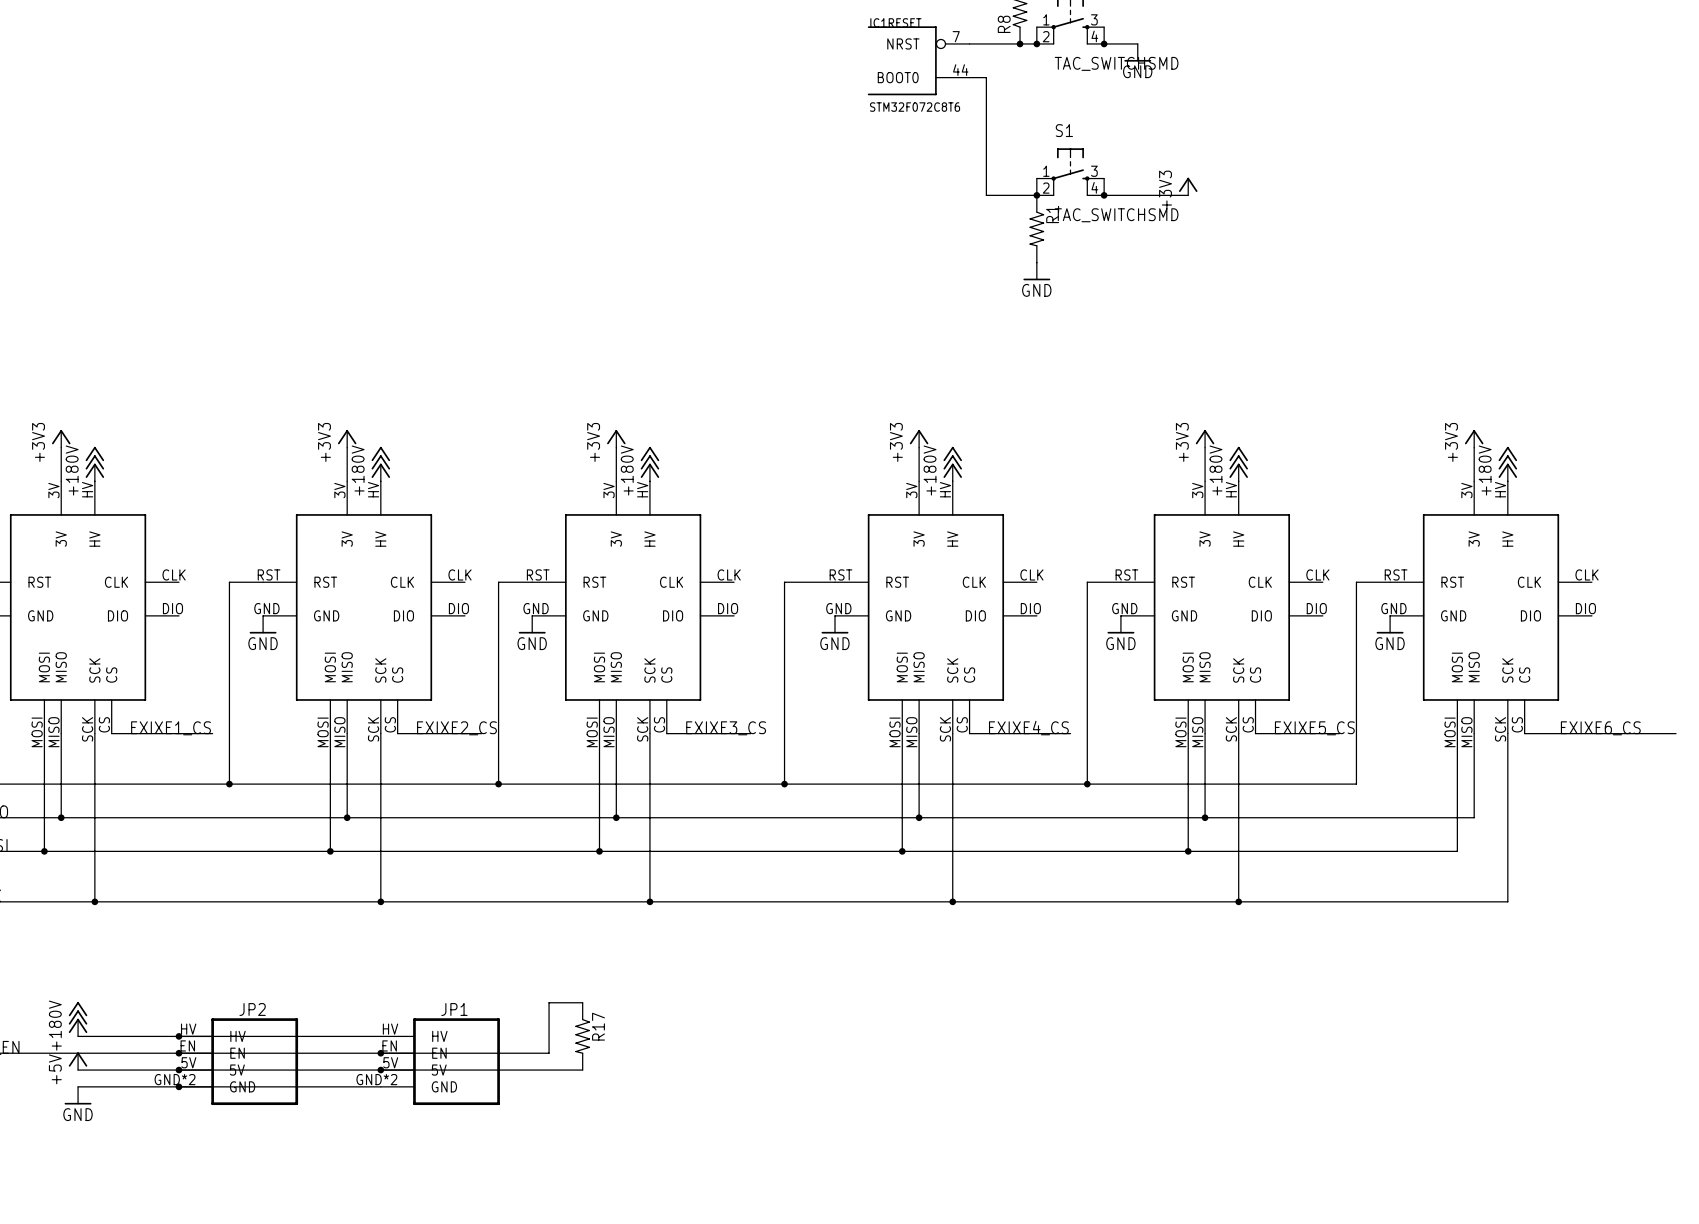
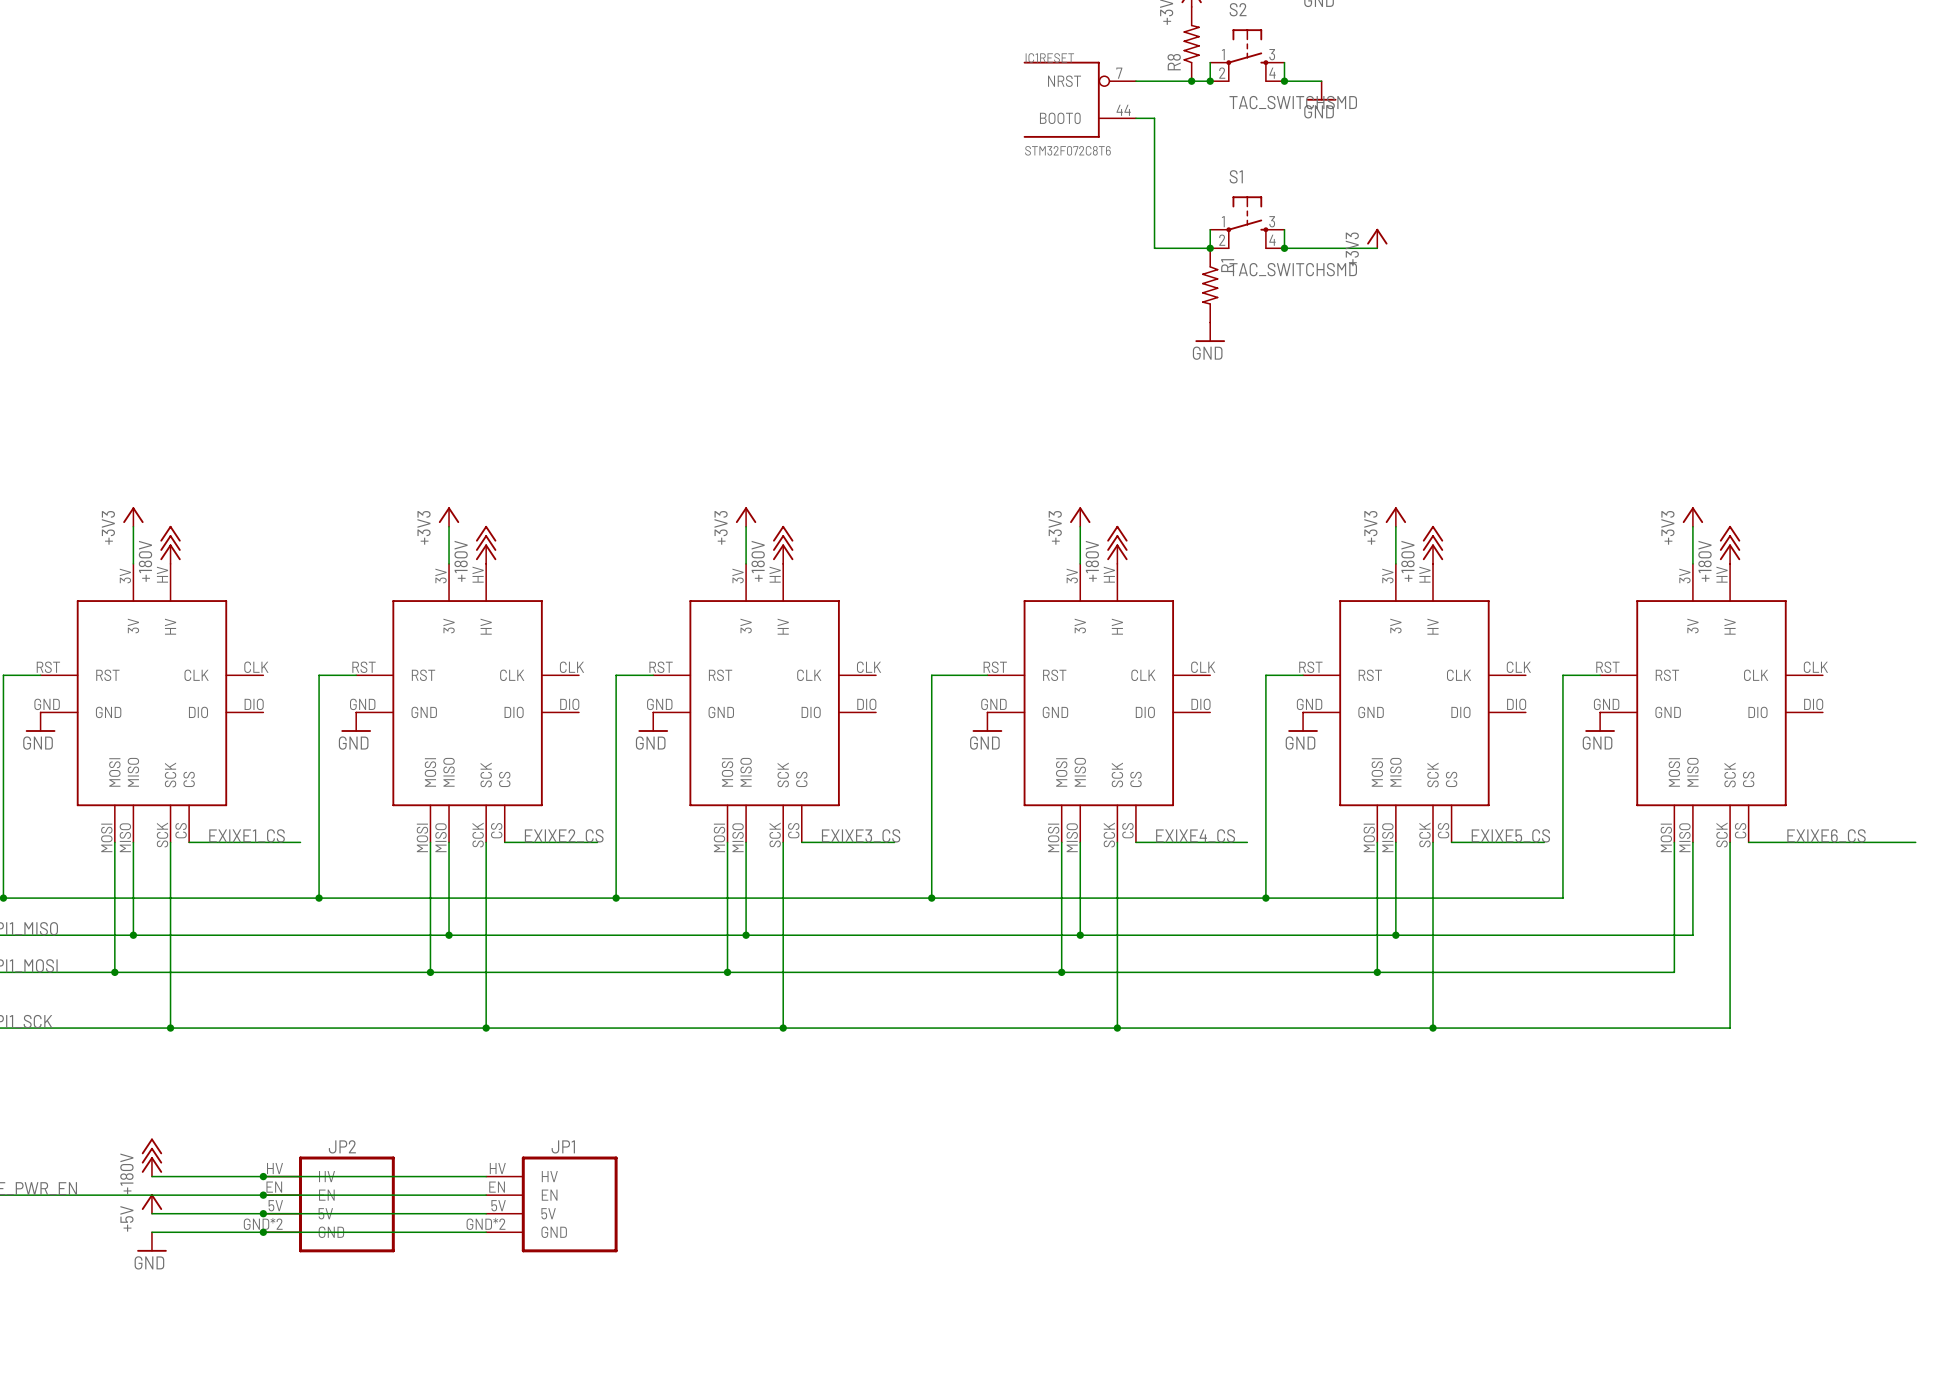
wire: (582, 1002) (549, 1002) (549, 1053) (380, 1053) -> none
R17: (582, 1036) -> none
junction: (380, 1053) -> none
wire: (380, 1070) (582, 1070) -> none
junction: (380, 1070) -> none

